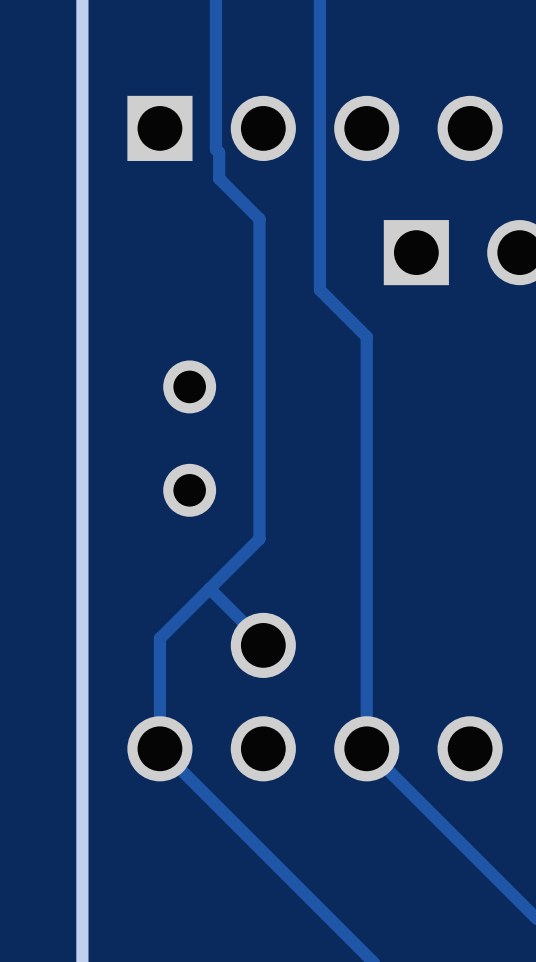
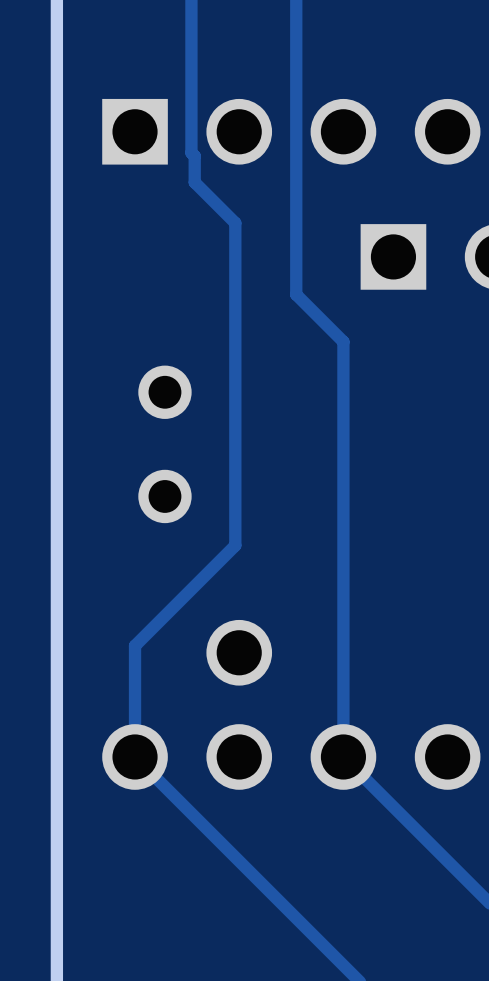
track: (209, 588) (263, 642) (263, 645) -> none

